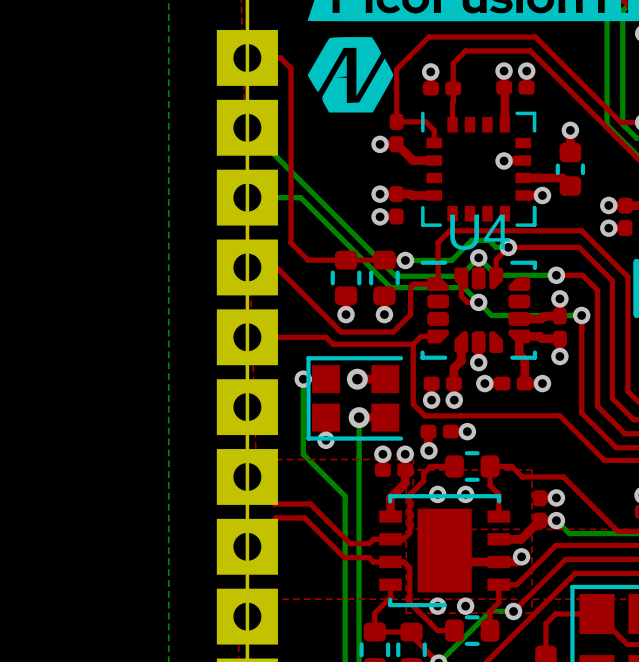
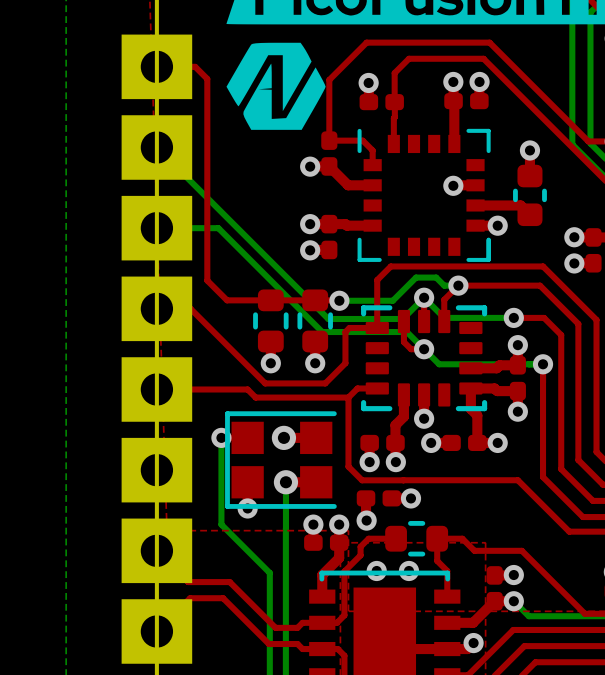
U4: (478, 310) -> none
part: none -> (424, 358)

